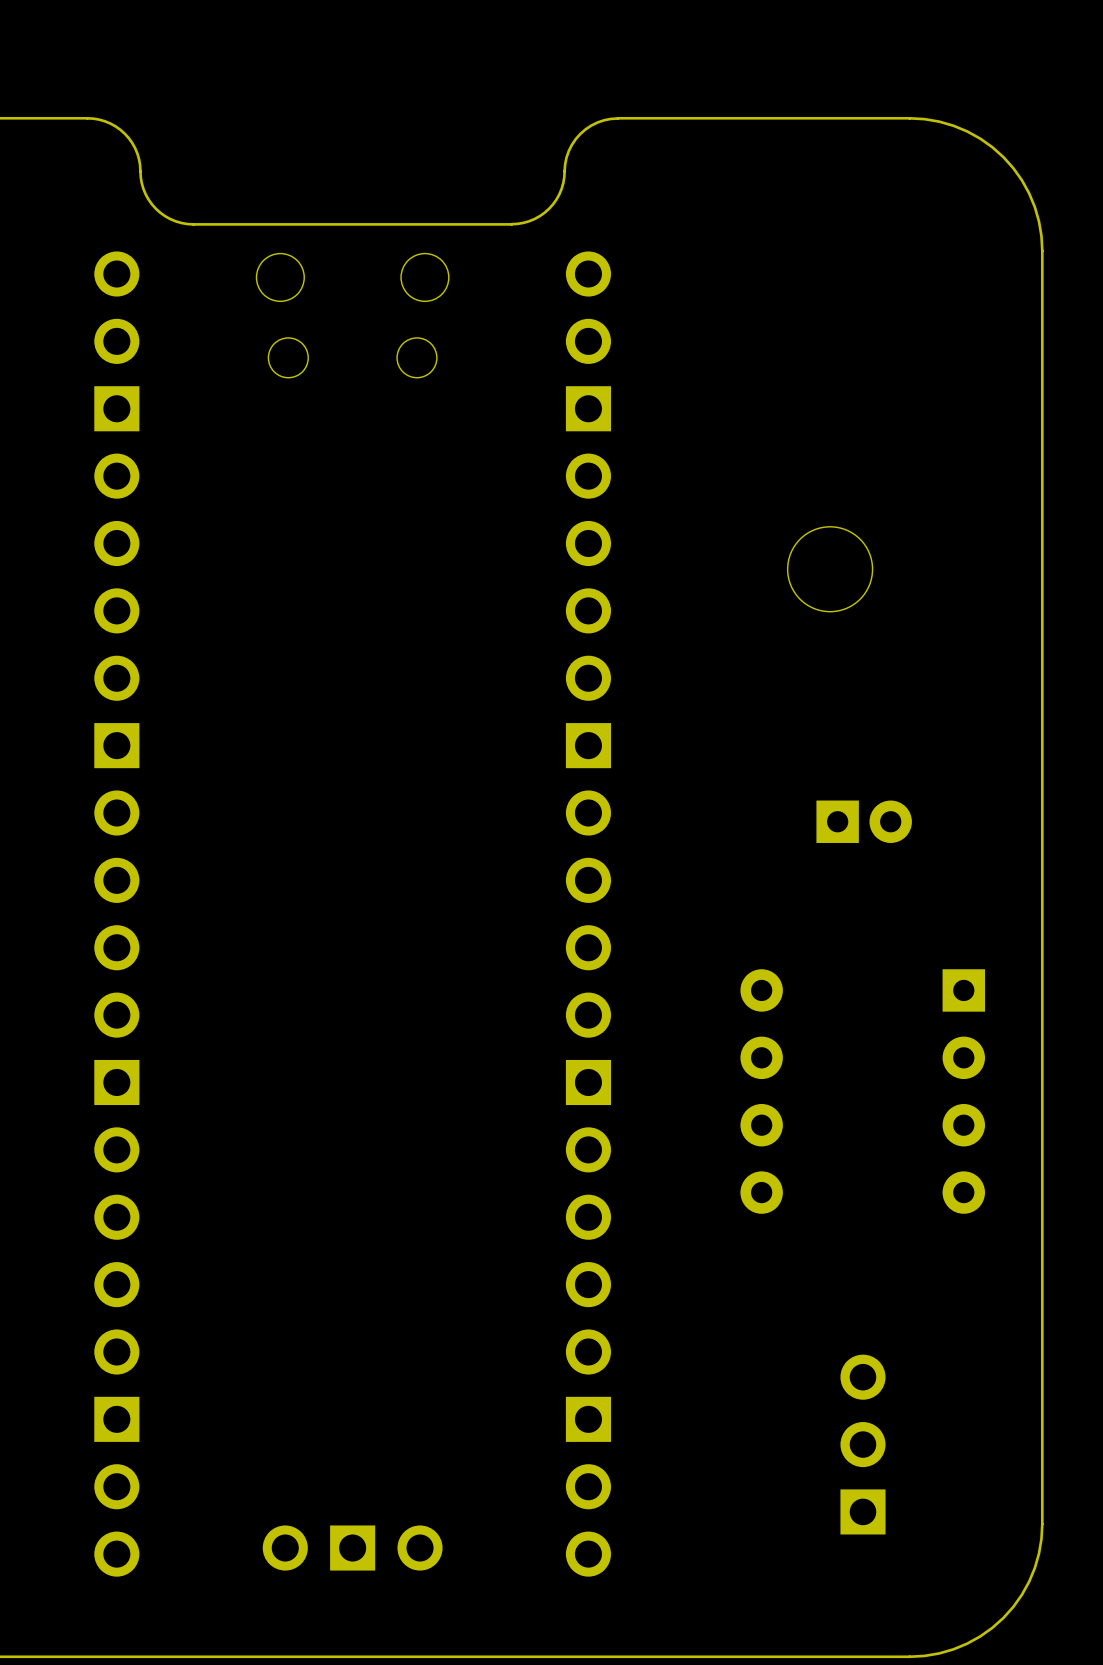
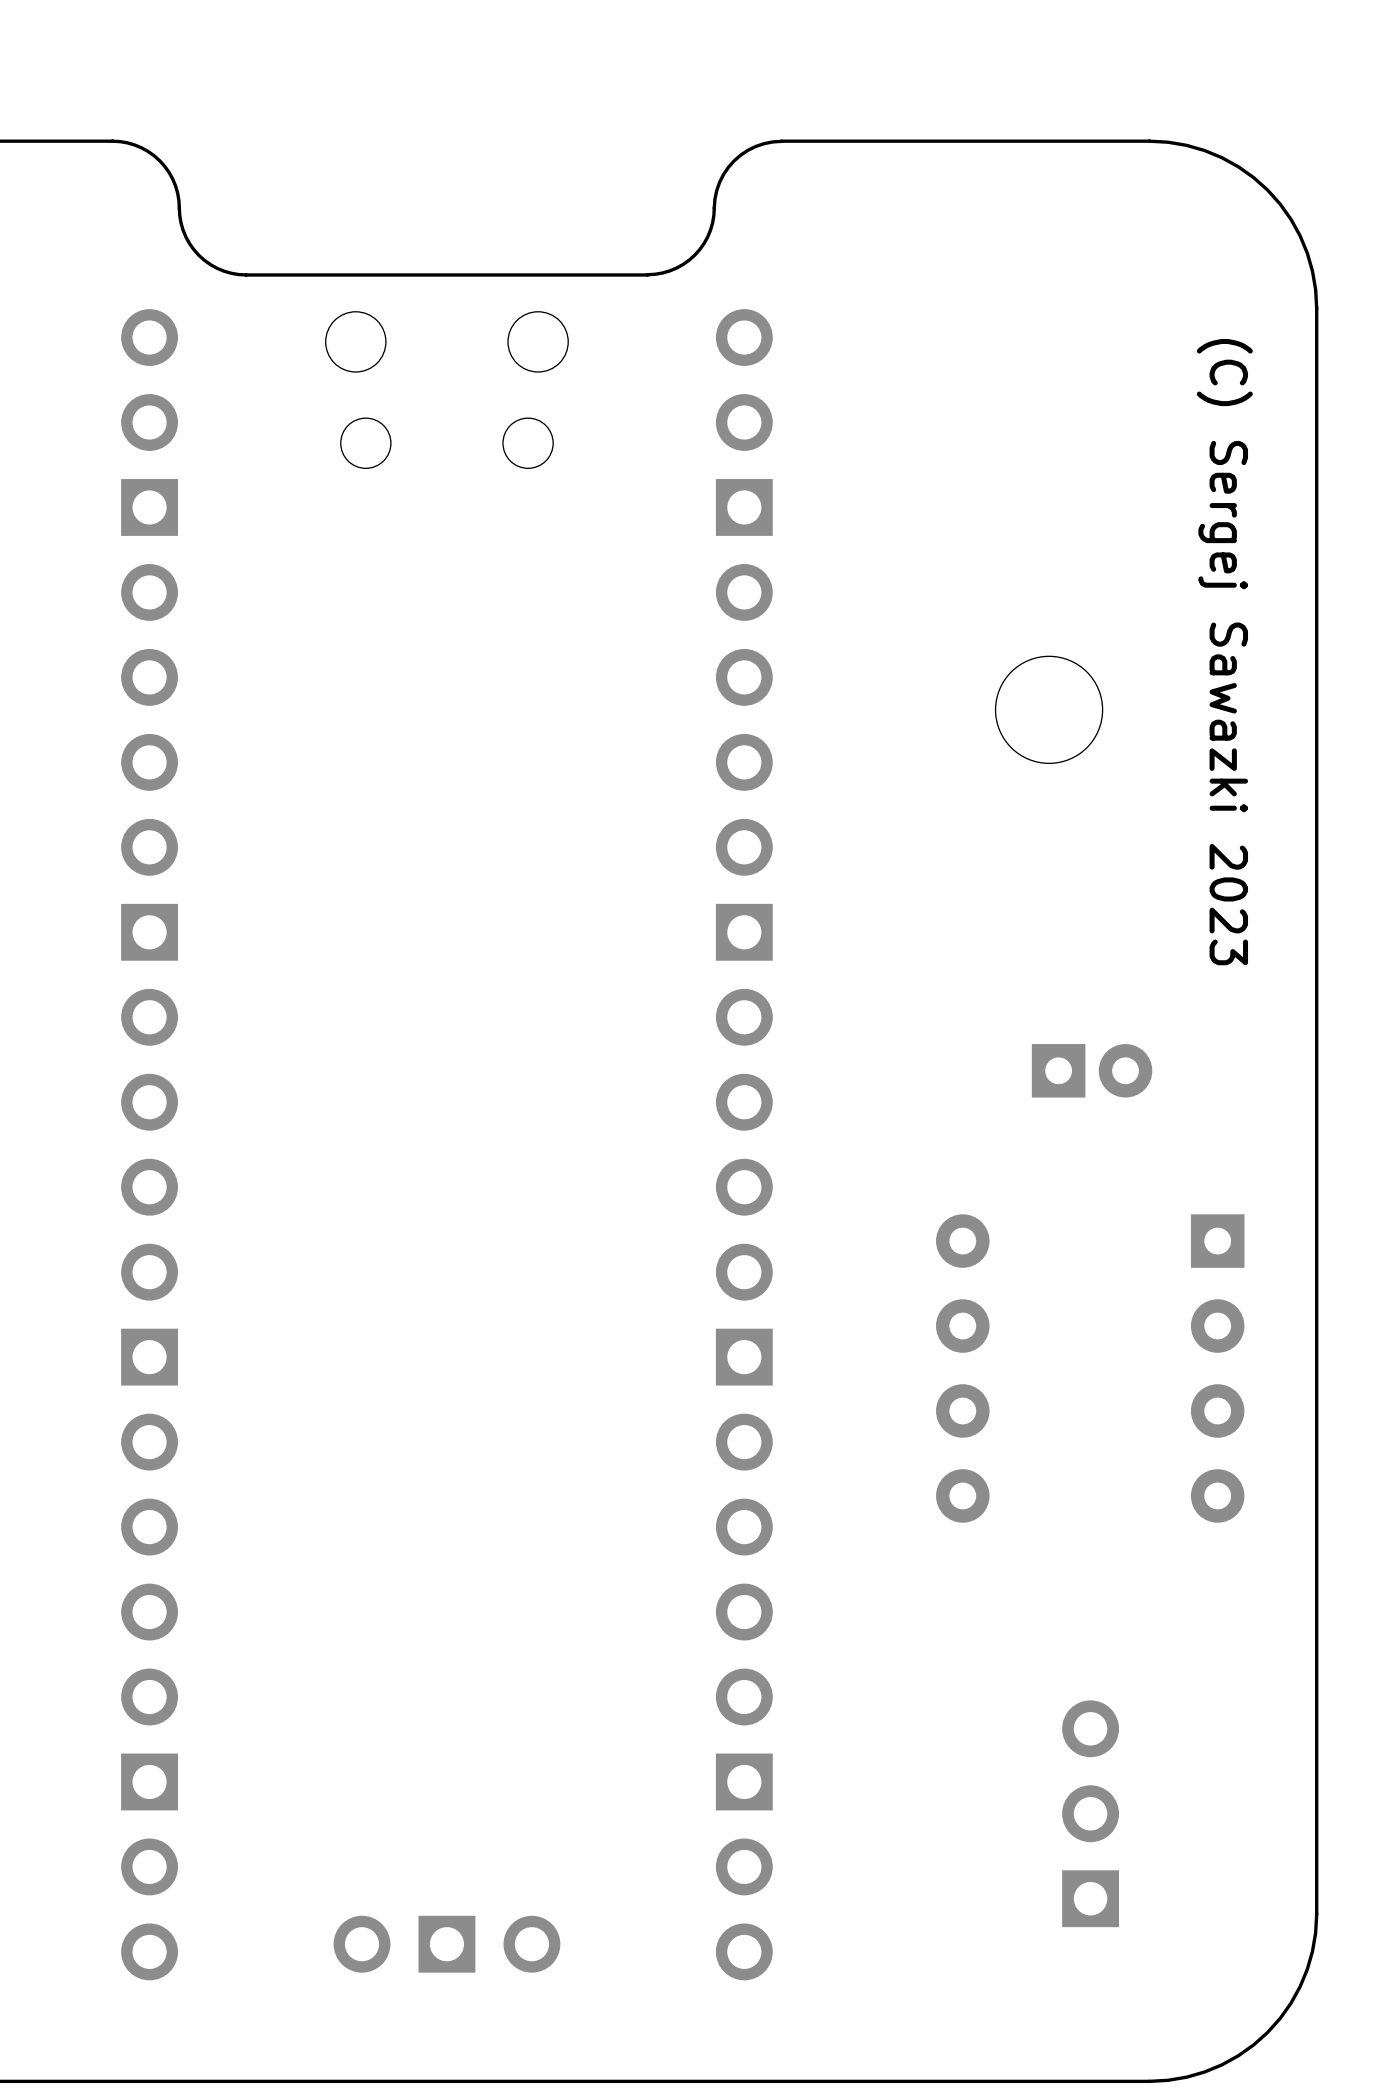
text: none -> (C) Sergej Sawazki 2023 (1224, 652)
part position: (864, 821) -> (1092, 1070)

